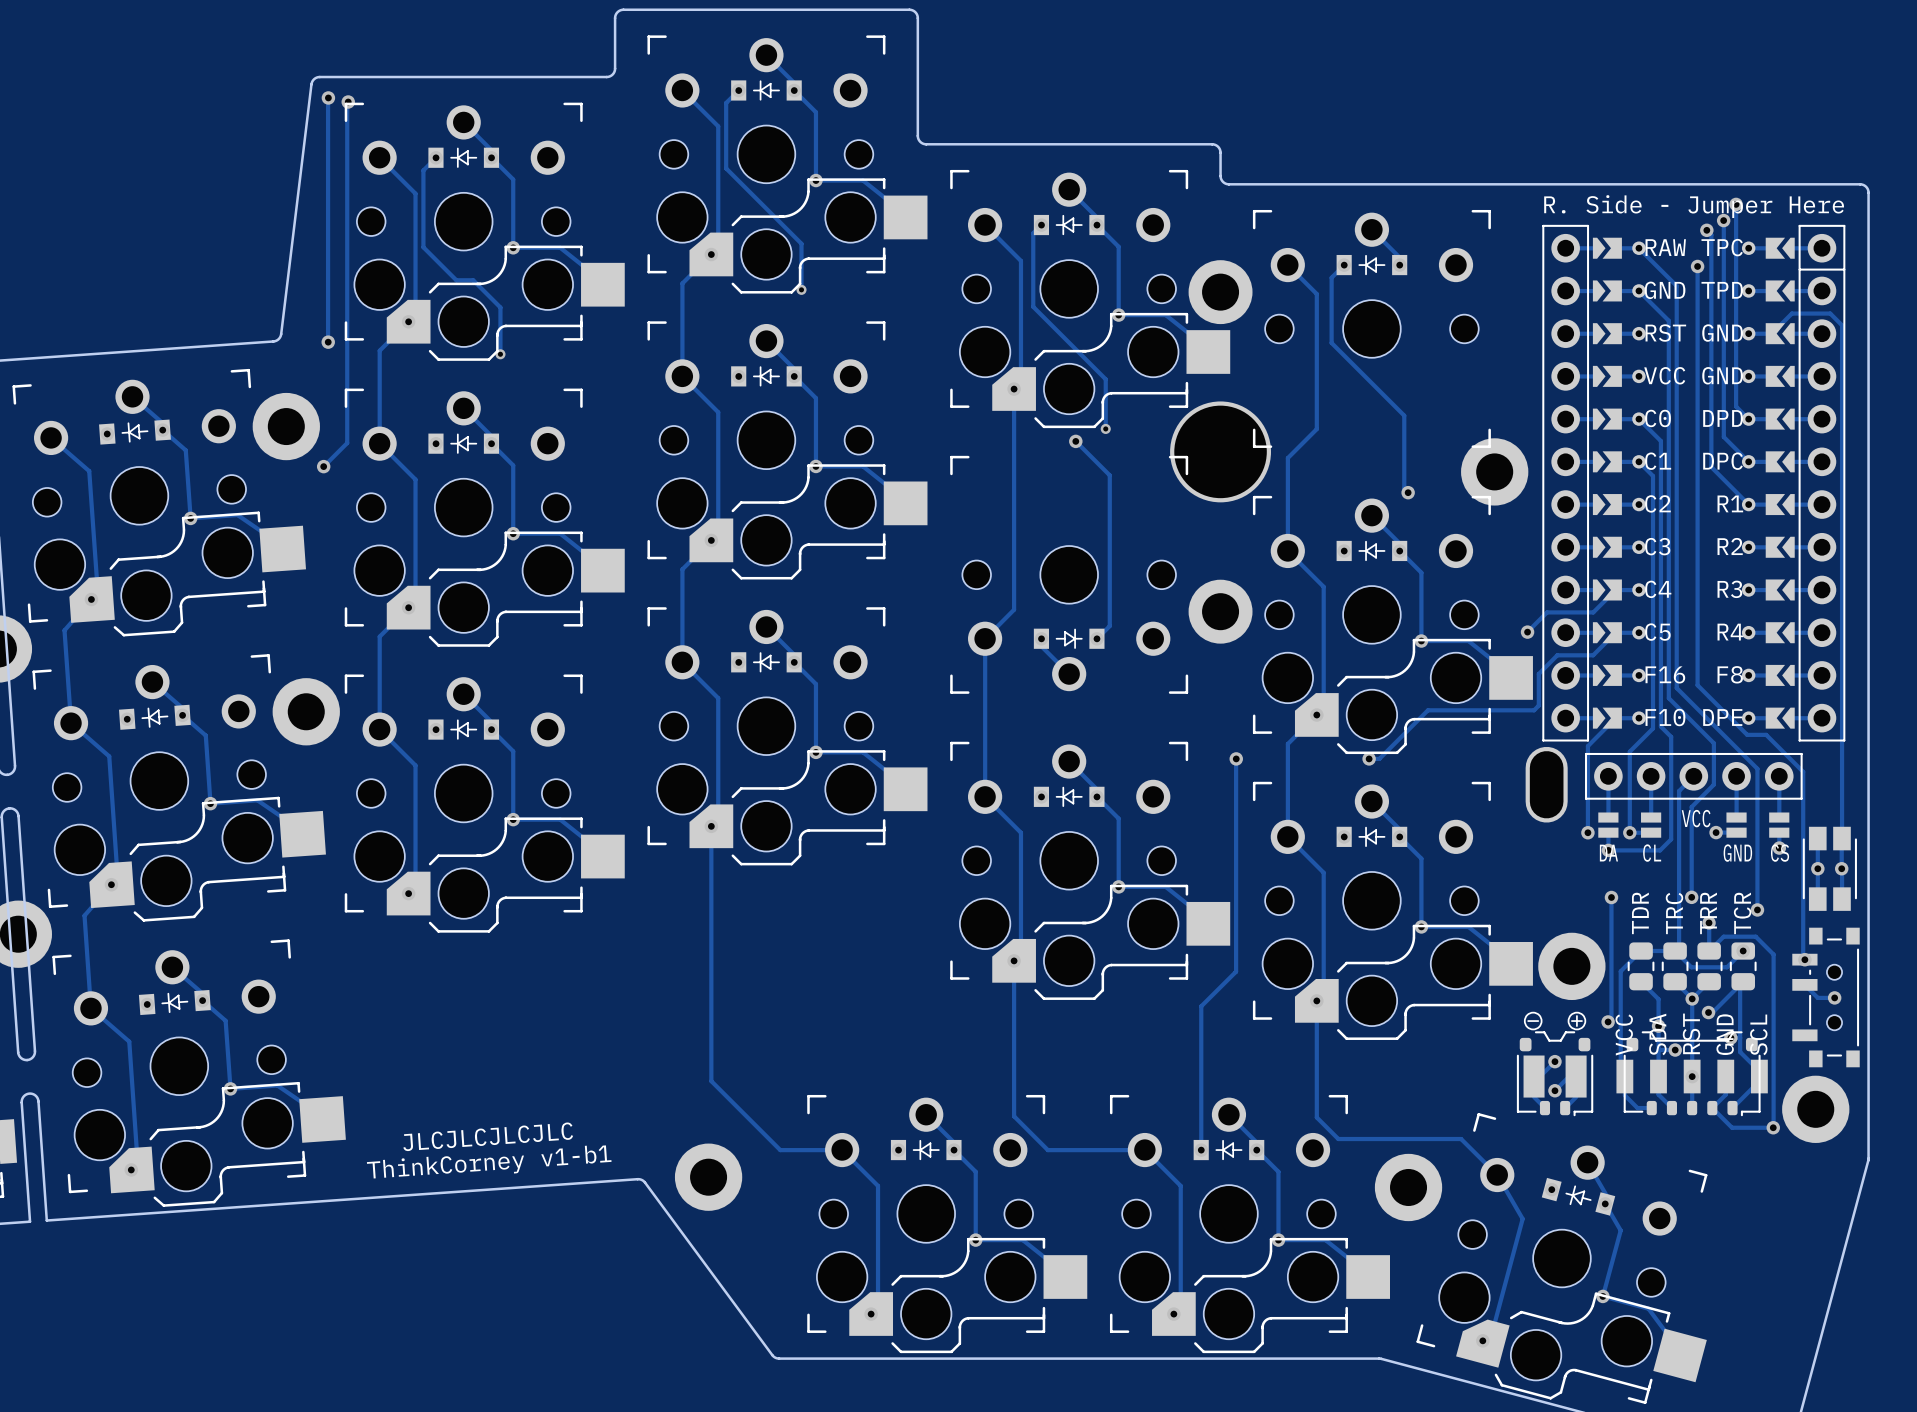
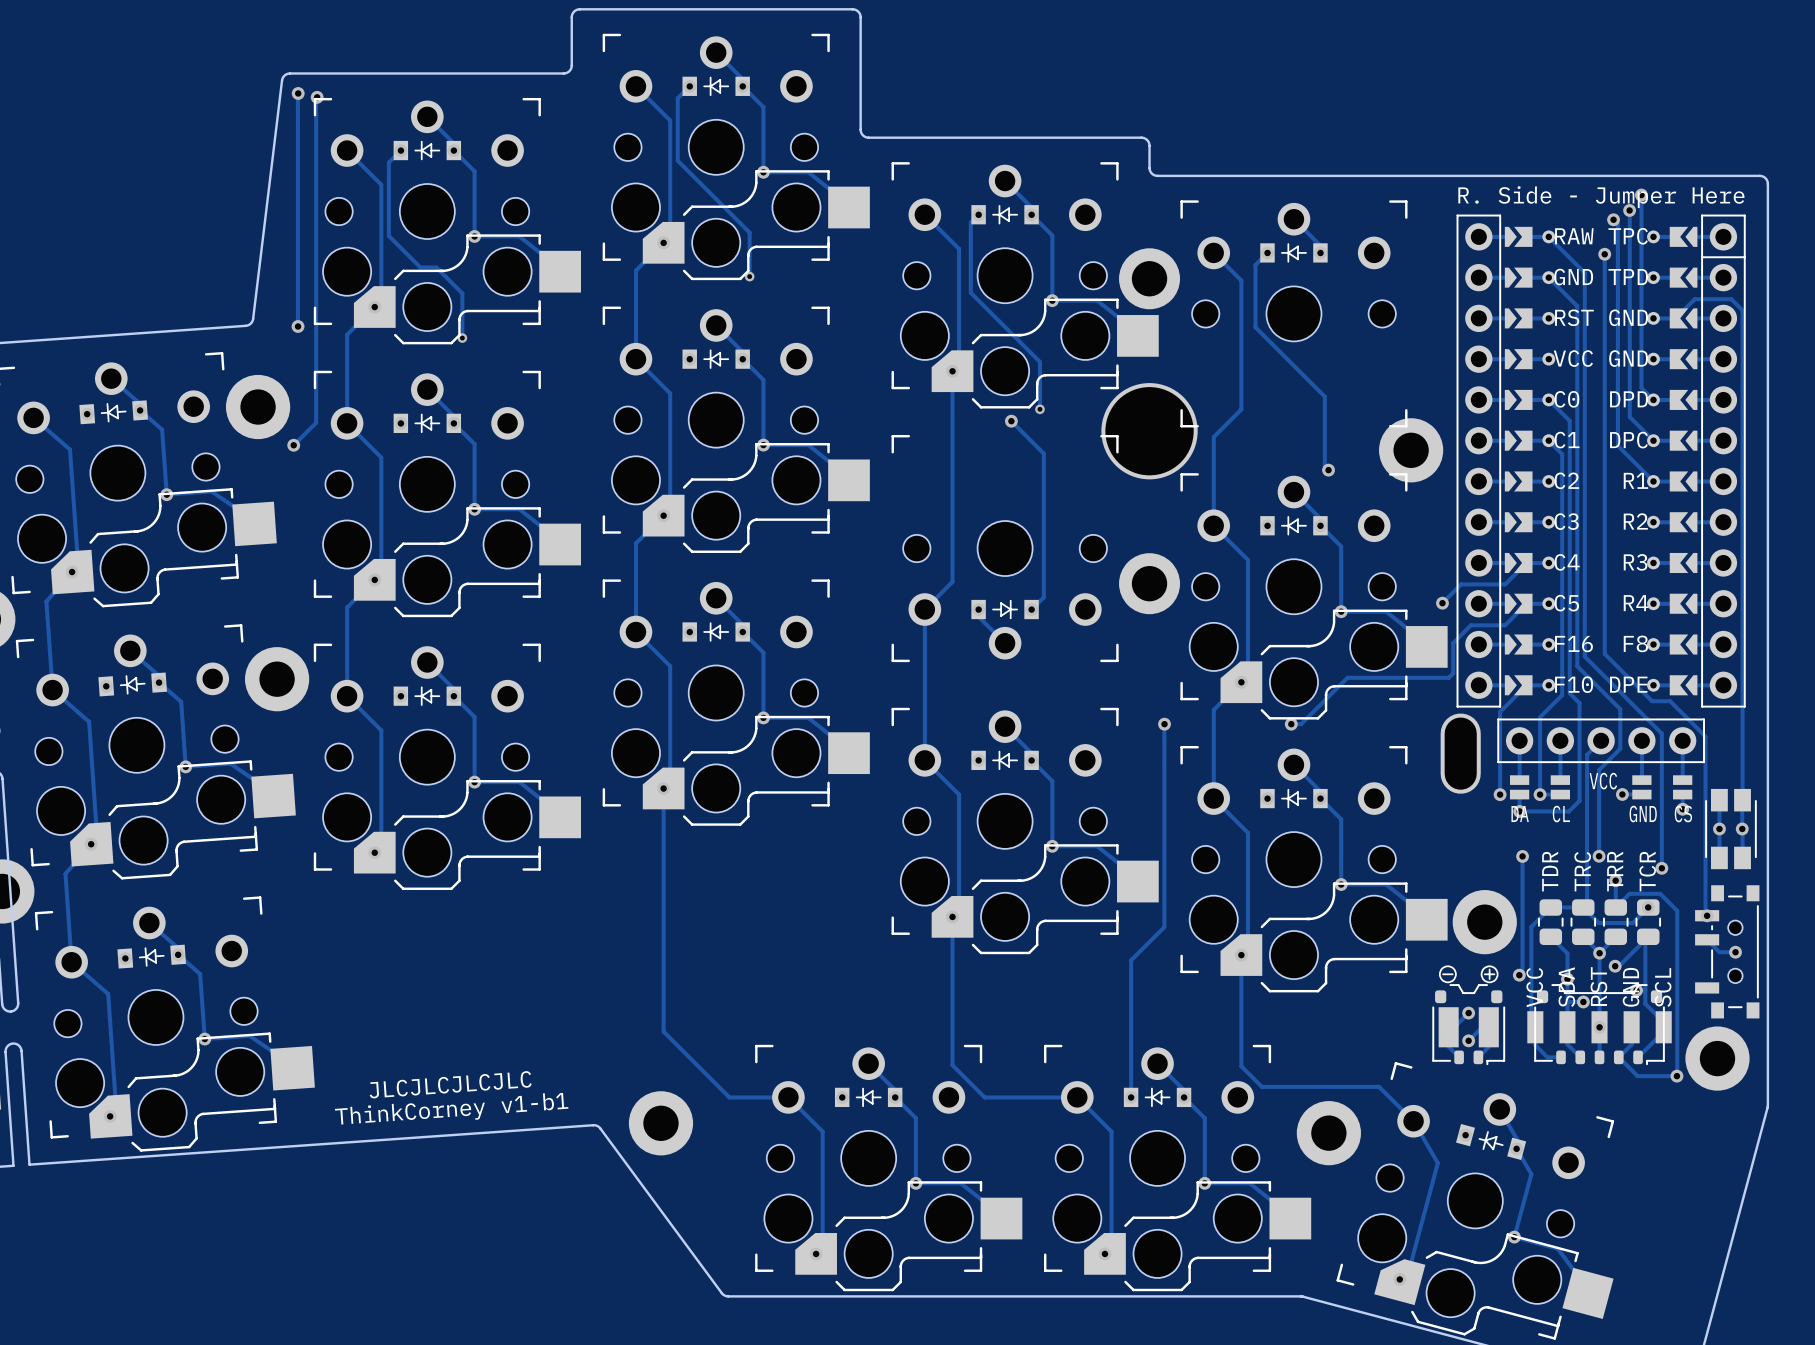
part footprint: [1525, 746, 1568, 823] -> [1440, 713, 1481, 794]

